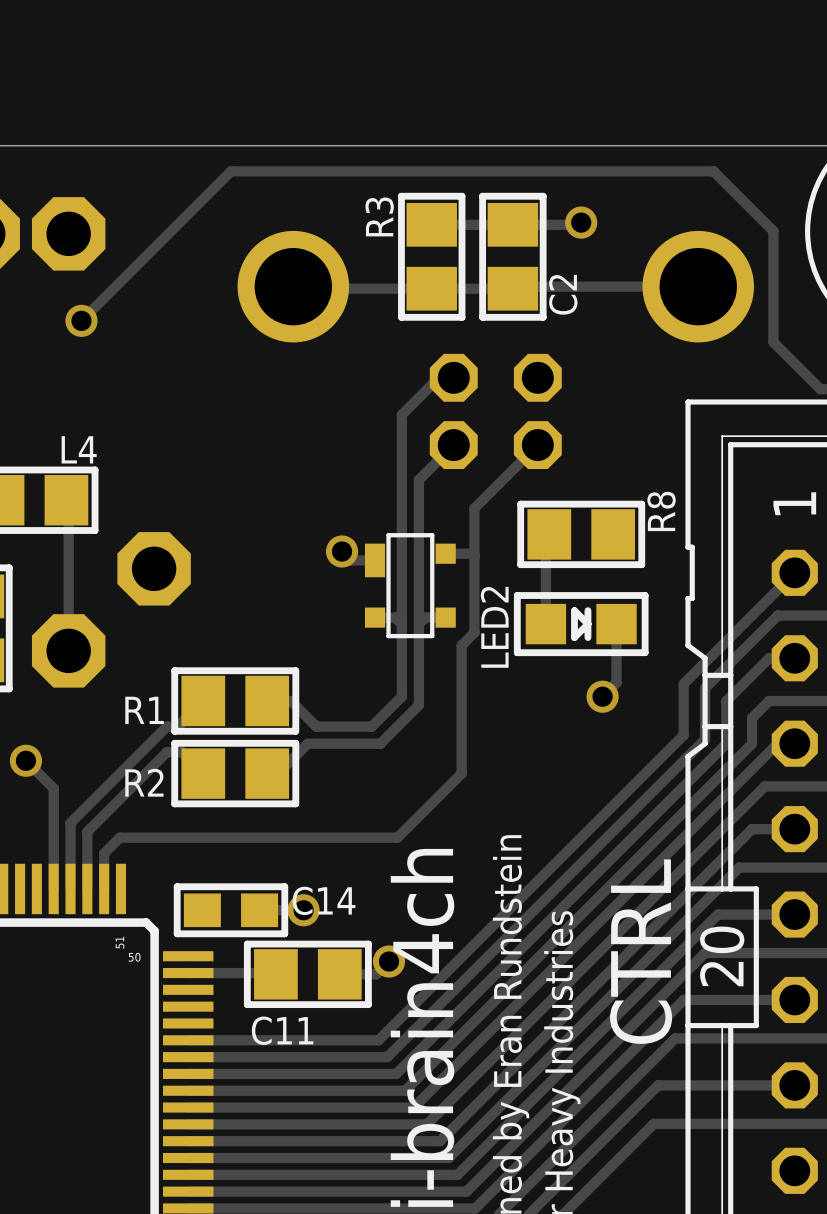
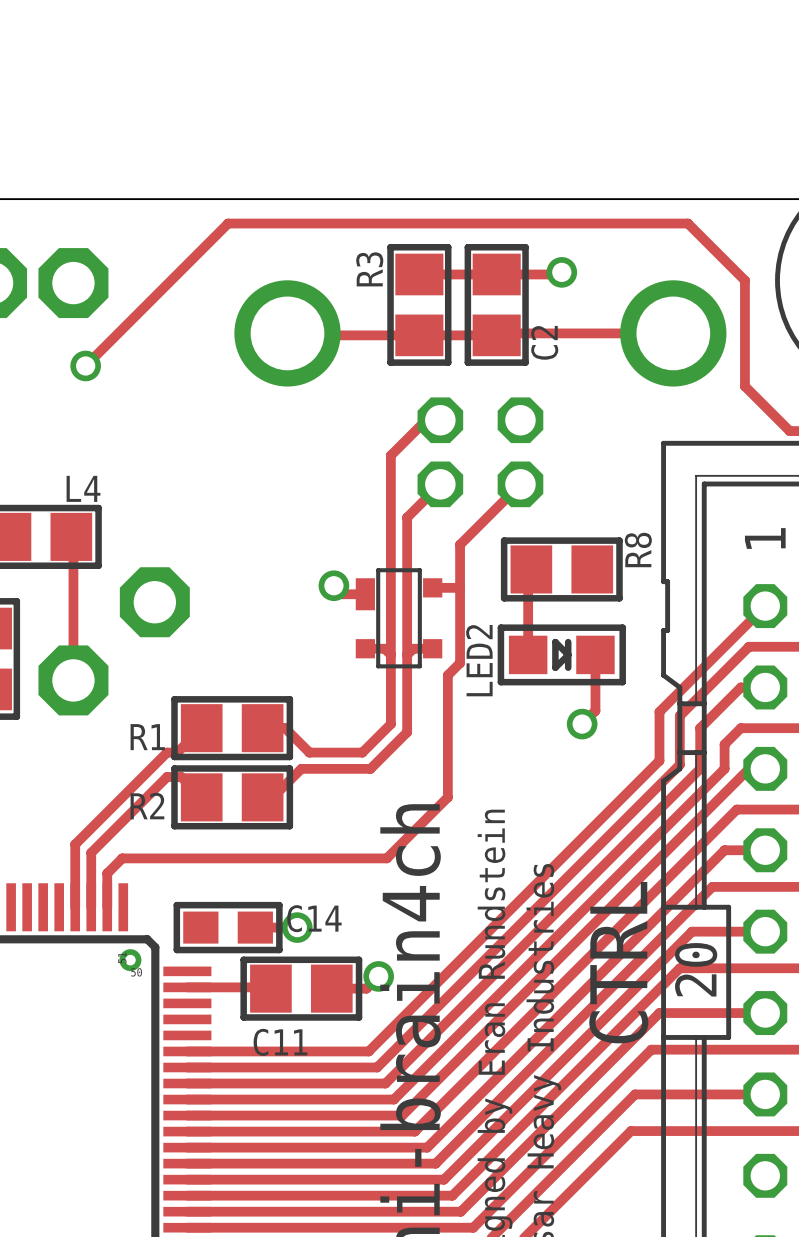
track: (25, 760) (53, 788) (53, 888) -> none
via: (25, 760) -> none
via: none -> (130, 960)

